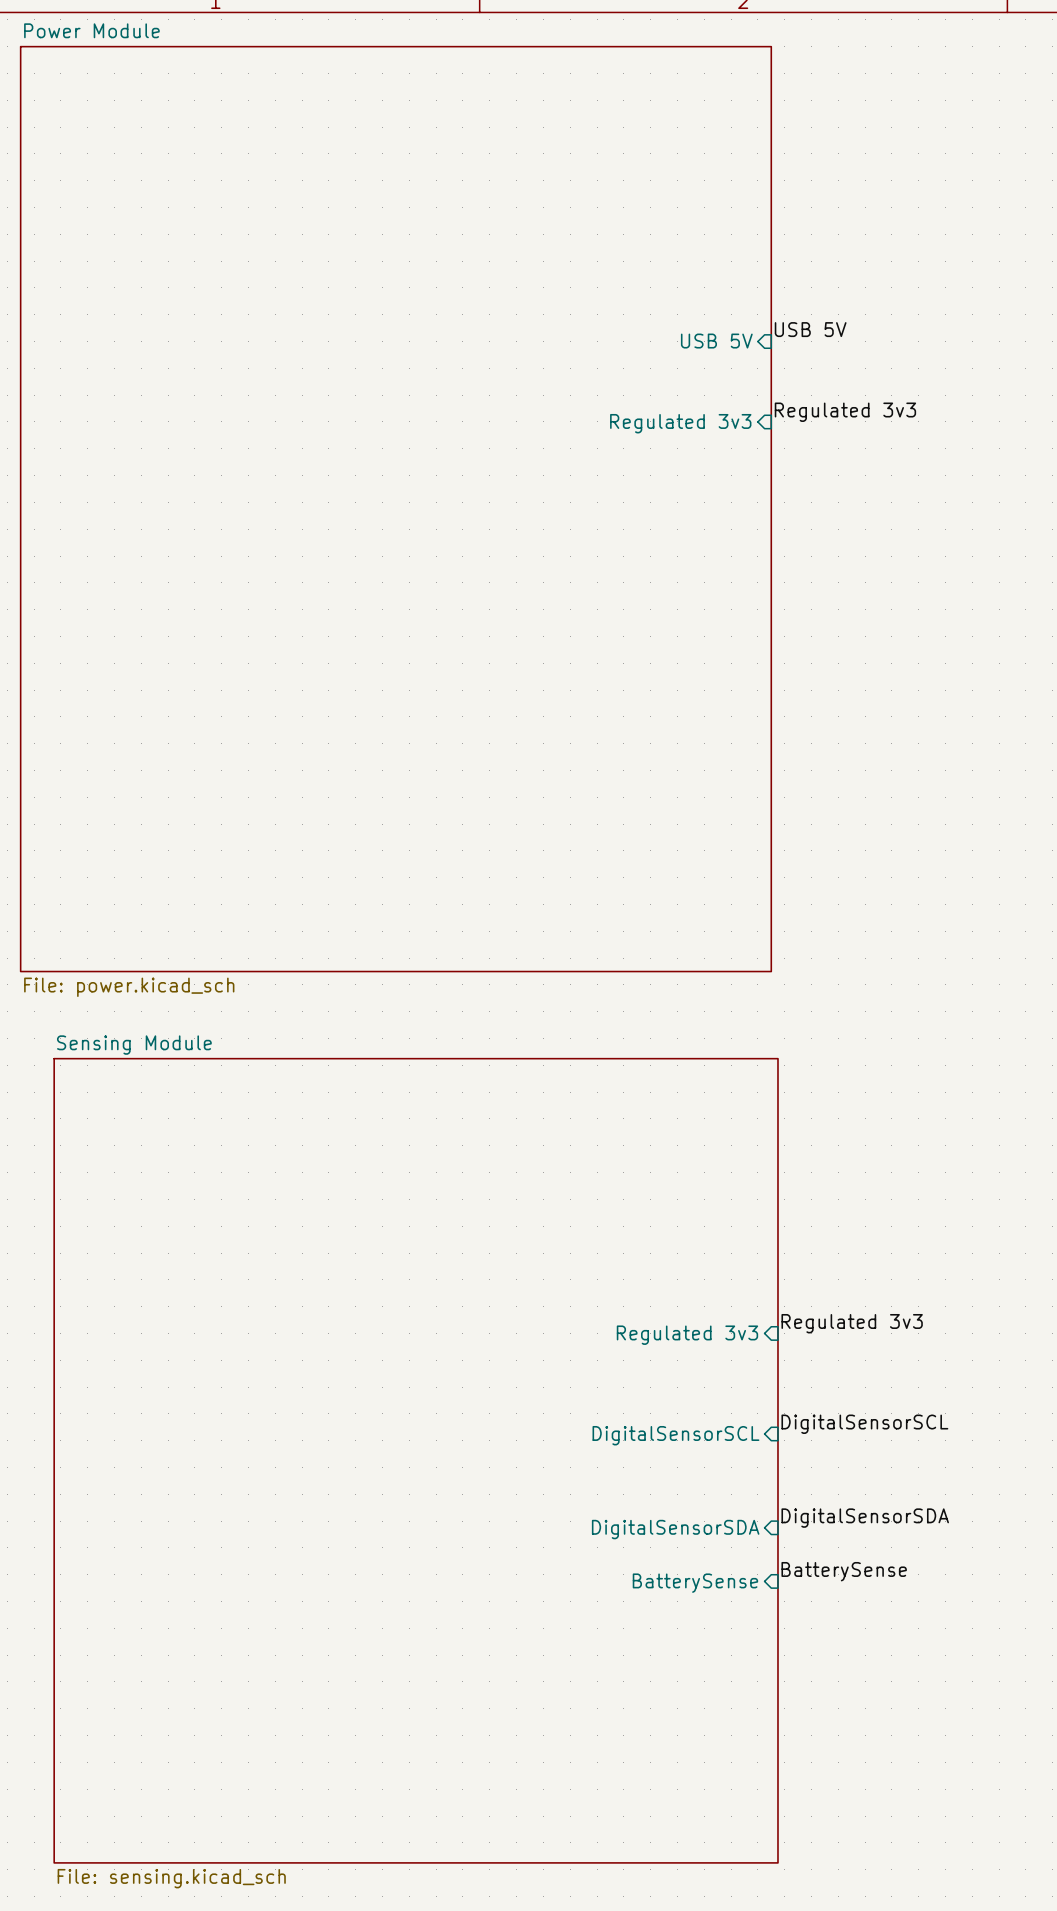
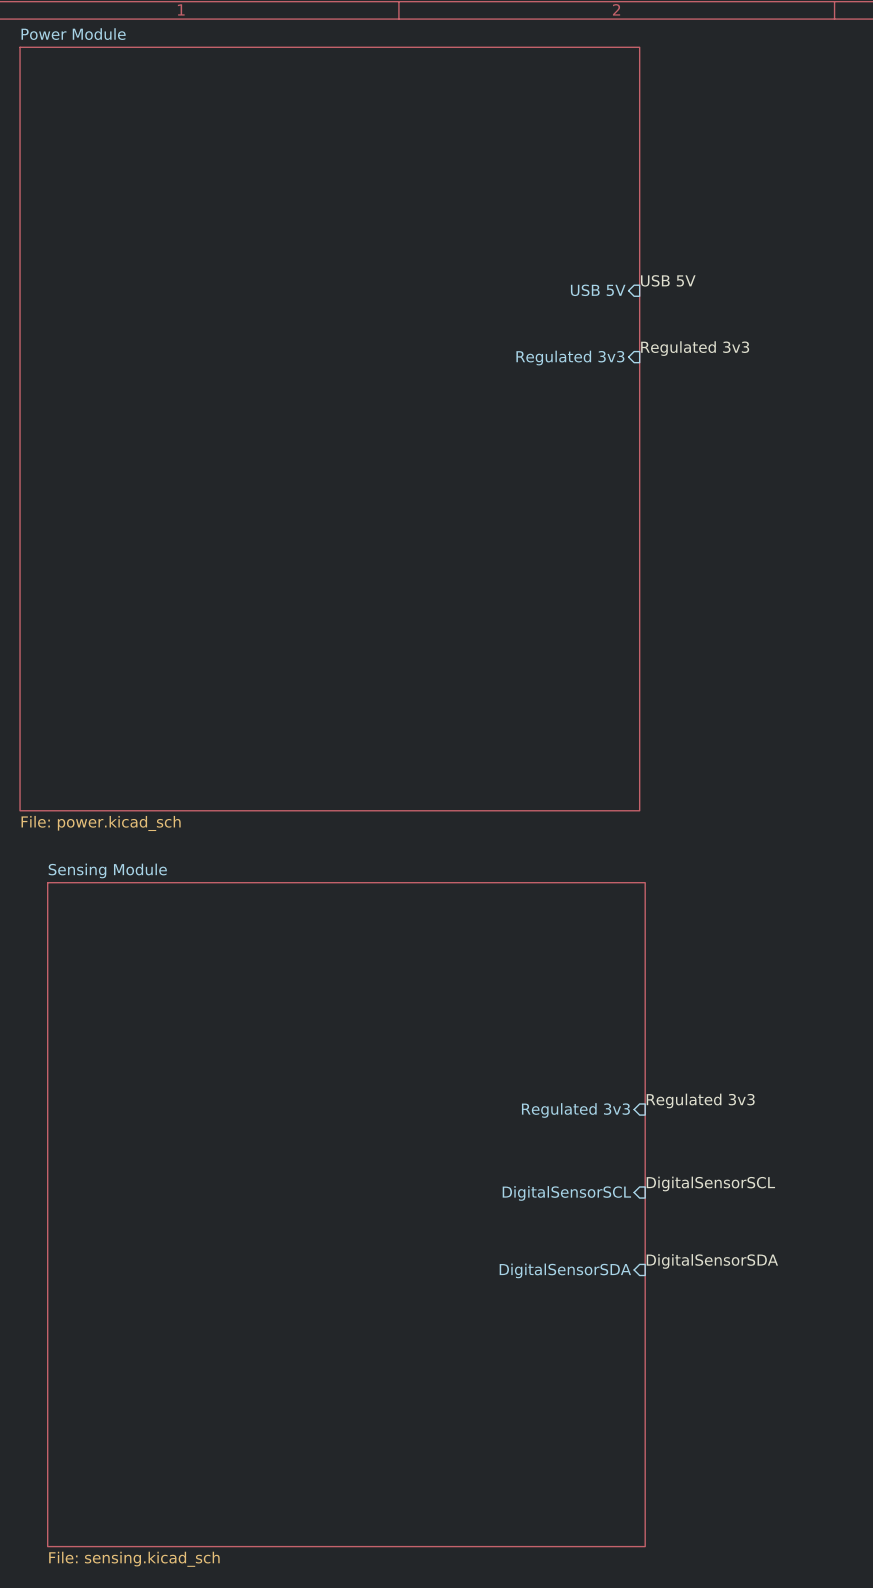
label: BatterySense (844, 1571) -> none
sheet pin: BatterySense (695, 1583) -> none

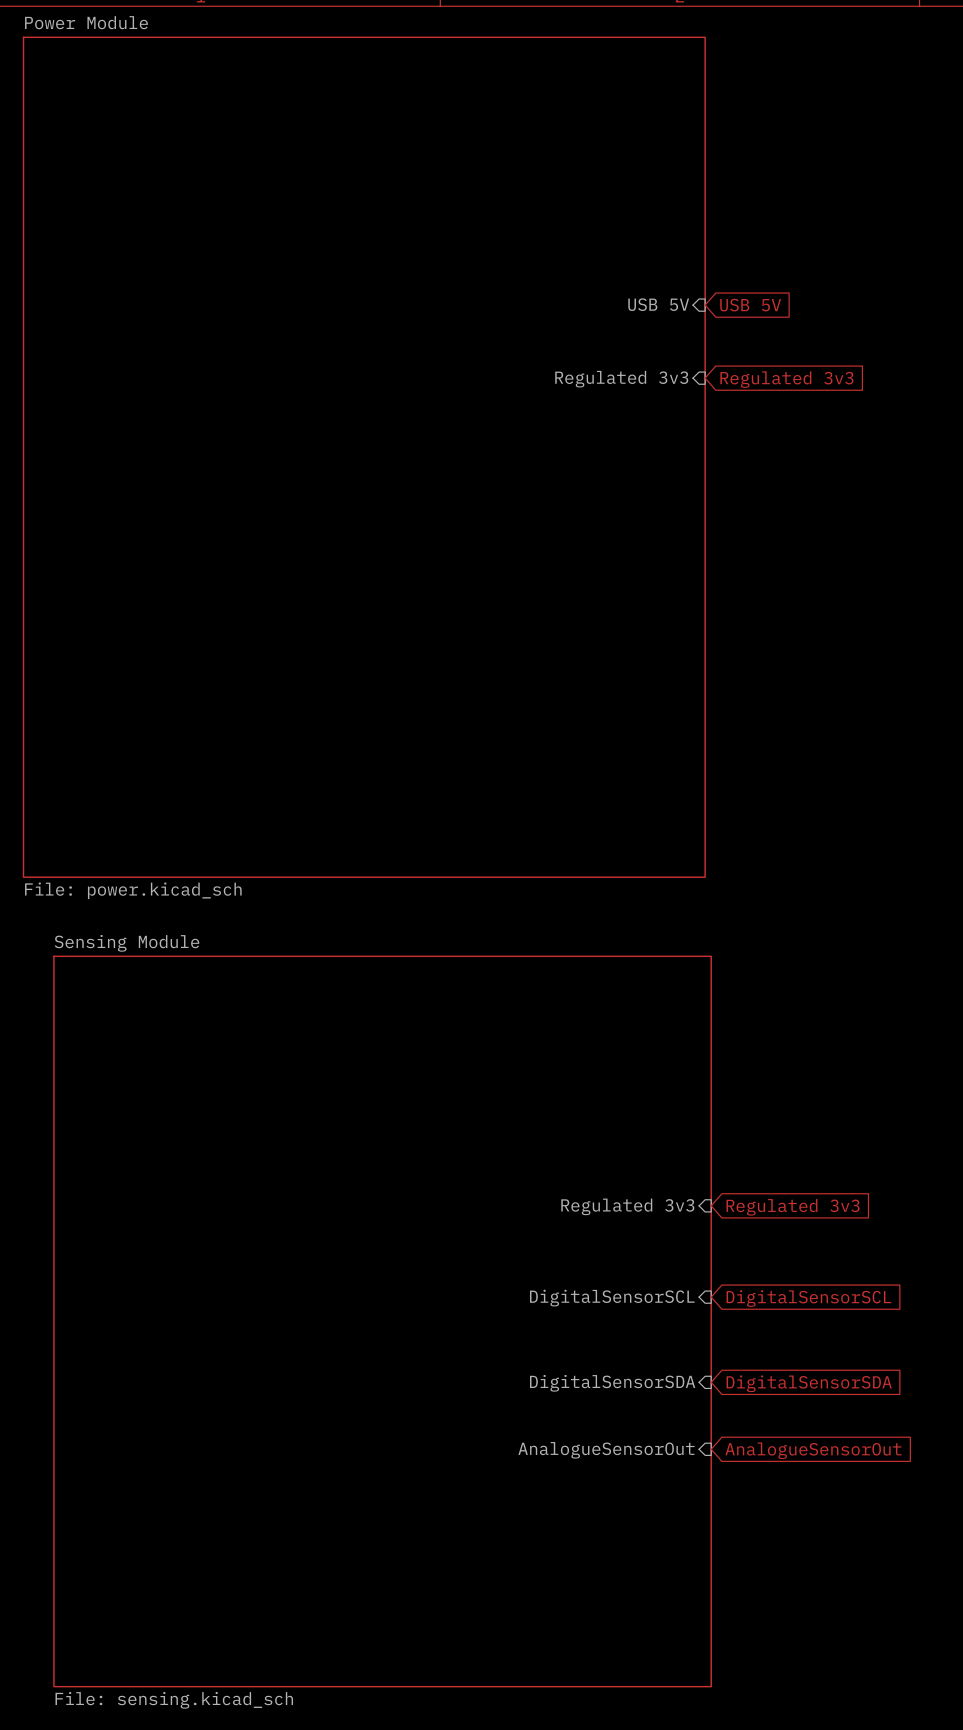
label: USB 5V (668, 280) -> none
global label: none -> USB 5V (750, 305)
label: Regulated 3v3 (695, 348) -> none
global label: none -> Regulated 3v3 (786, 379)
label: Regulated 3v3 (700, 1101) -> none
global label: none -> Regulated 3v3 (793, 1207)
label: DigitalSensorSCL (710, 1183) -> none
global label: none -> DigitalSensorSCL (808, 1298)
label: DigitalSensorSDA (712, 1261) -> none
global label: none -> DigitalSensorSDA (809, 1383)
sheet pin: none -> AnalogueSensorOut (606, 1450)
global label: none -> AnalogueSensorOut (813, 1450)

